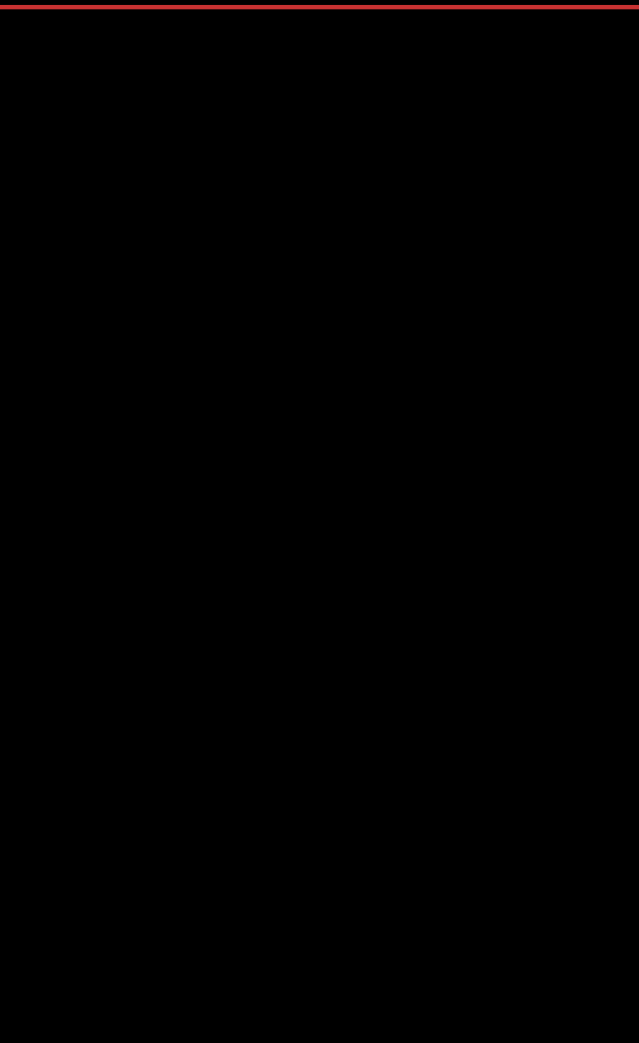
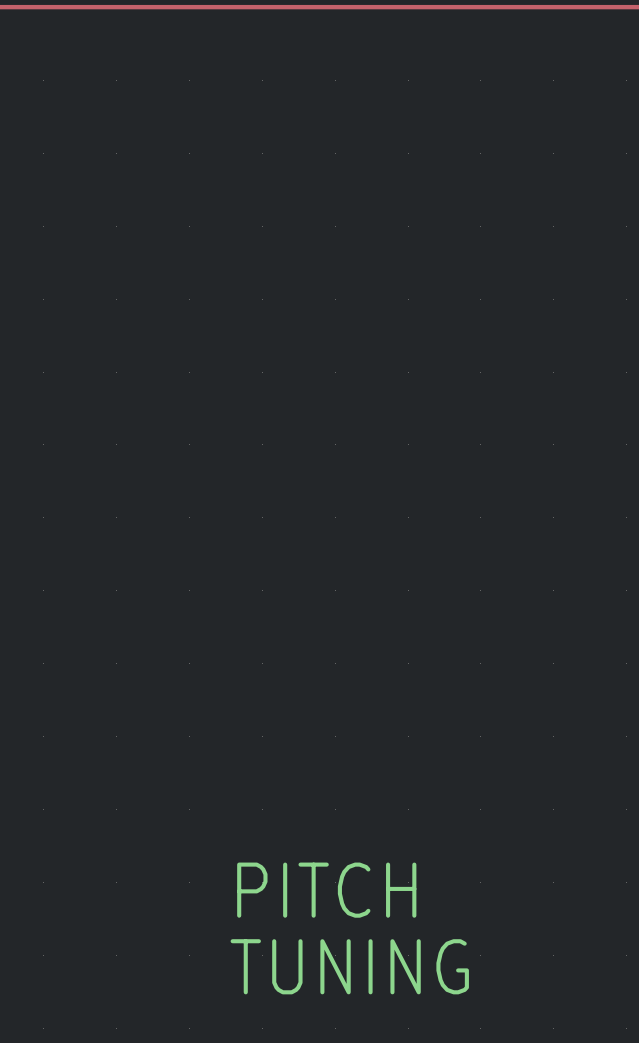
text: none -> PITCH (326, 890)
text: none -> TUNING (349, 966)

